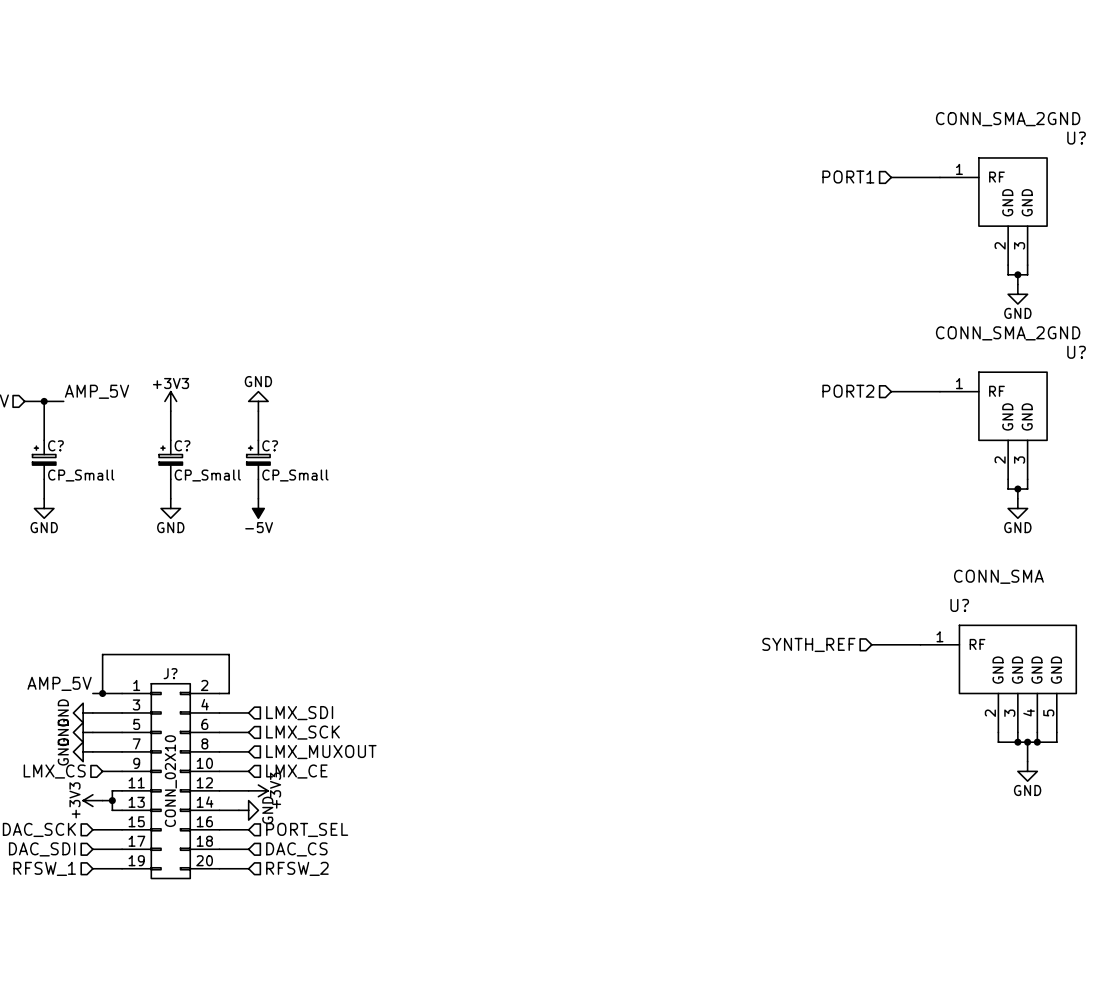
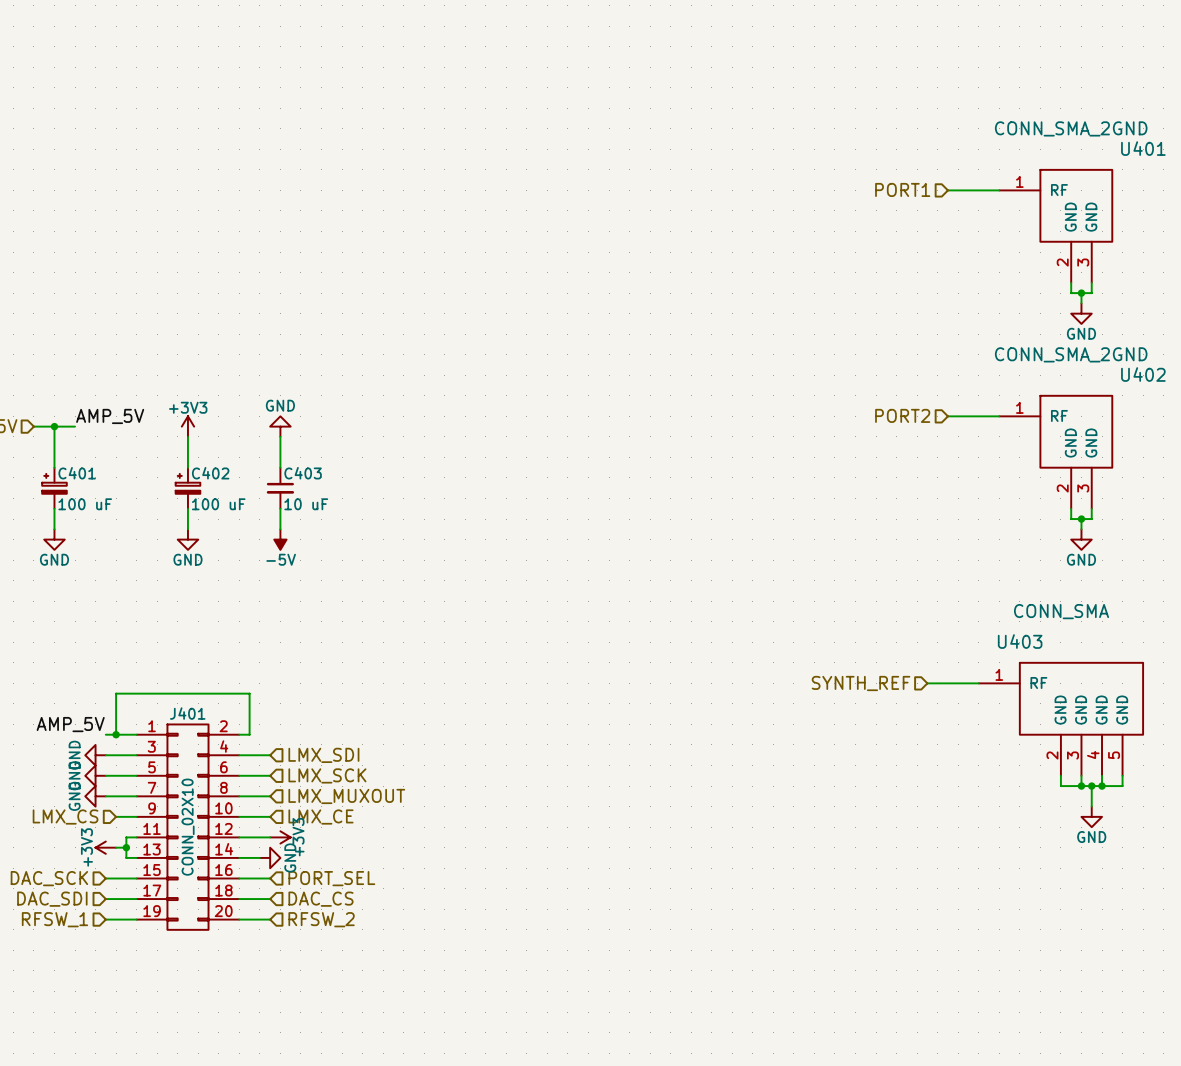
U? name: U? (1076, 138) -> U401 (1143, 148)
U? name: U? (1076, 352) -> U402 (1143, 374)
C? name: C? (55, 445) -> C401 (77, 473)
C? name: C? (182, 445) -> C402 (210, 473)
C?: CP_Small (258, 459) -> none
C403: none -> 10 uF (280, 488)
C? value: CP_Small (81, 475) -> 100 uF (85, 504)
C? value: CP_Small (207, 475) -> 100 uF (218, 504)
U? name: U? (959, 605) -> U403 (1020, 641)
J? name: J? (170, 673) -> J401 (187, 713)

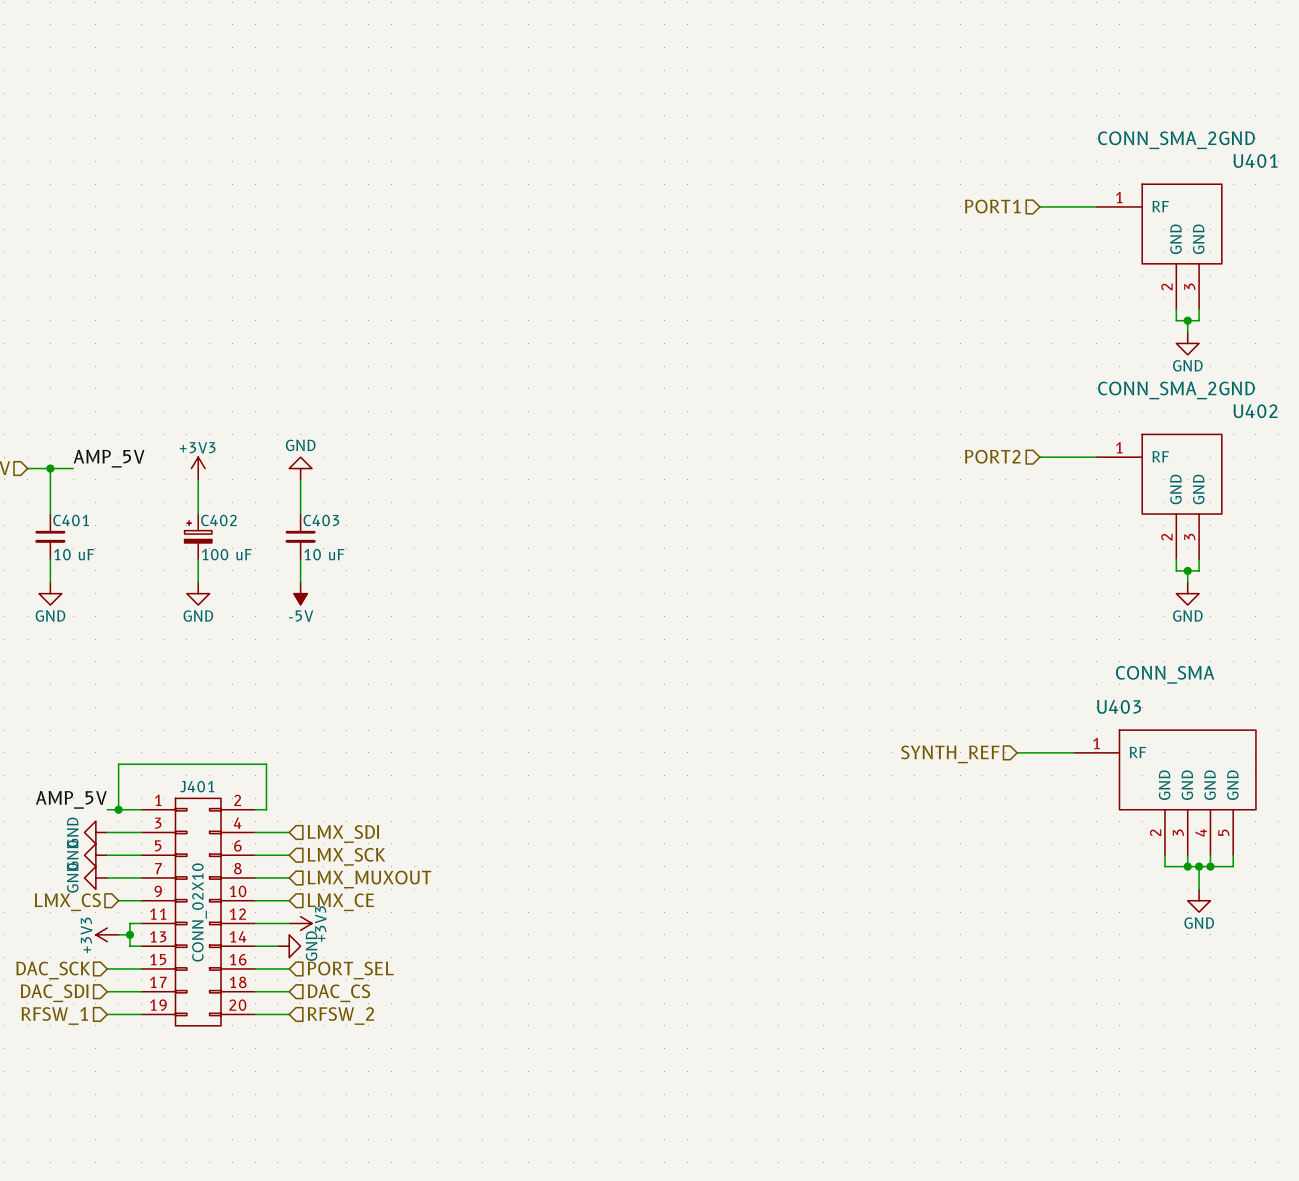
C401 symbol: [42, 467, 67, 509] -> [35, 514, 66, 560]
C401 value: 100 uF (85, 504) -> 10 uF (74, 554)

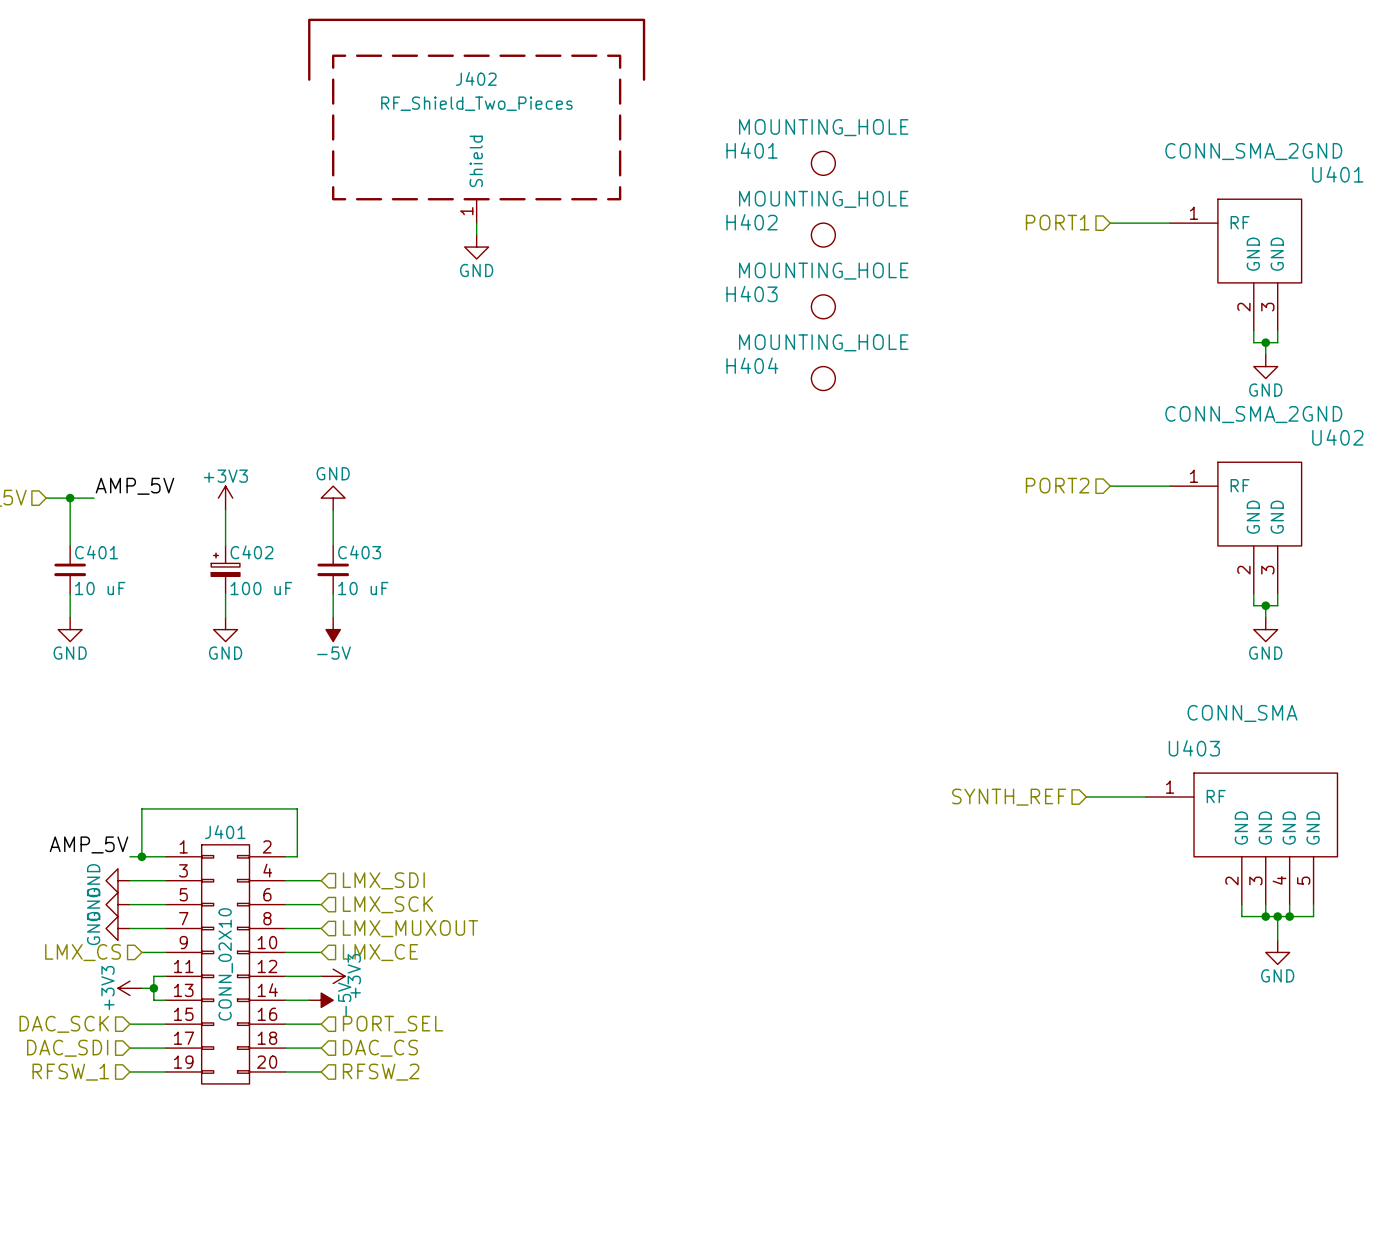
J402: none -> RF_Shield_Two_Pieces (476, 120)
H401: none -> MOUNTING_HOLE (823, 163)
wire: none -> (476, 223) (476, 235)
H402: none -> MOUNTING_HOLE (823, 235)
power symbol: none -> GND (476, 247)
H403: none -> MOUNTING_HOLE (823, 306)
H404: none -> MOUNTING_HOLE (823, 378)
power symbol: GND (289, 946) -> -5V (321, 1000)

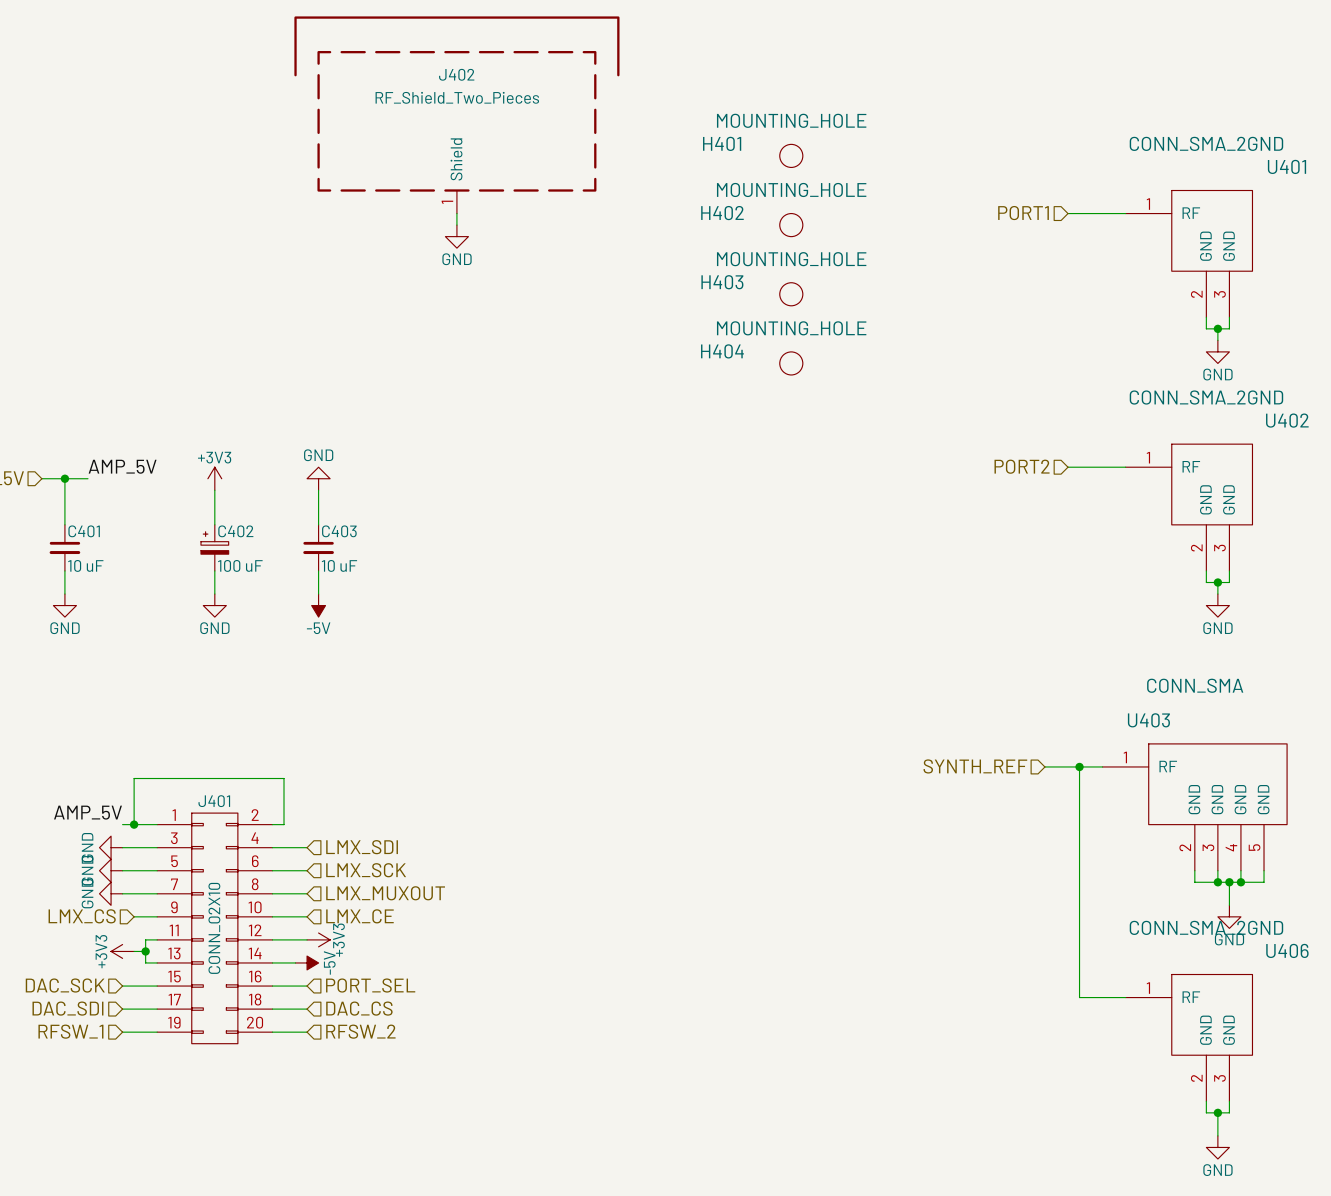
wire: none -> (1079, 766) (1079, 997) (1125, 997)
junction: none -> (1079, 766)
U406: none -> CONN_SMA_2GND (1189, 1037)
wire: none -> (1206, 1101) (1206, 1112) (1229, 1112) (1229, 1101)
wire: none -> (1217, 1112) (1217, 1135)
junction: none -> (1217, 1112)
power symbol: none -> GND (1217, 1147)

